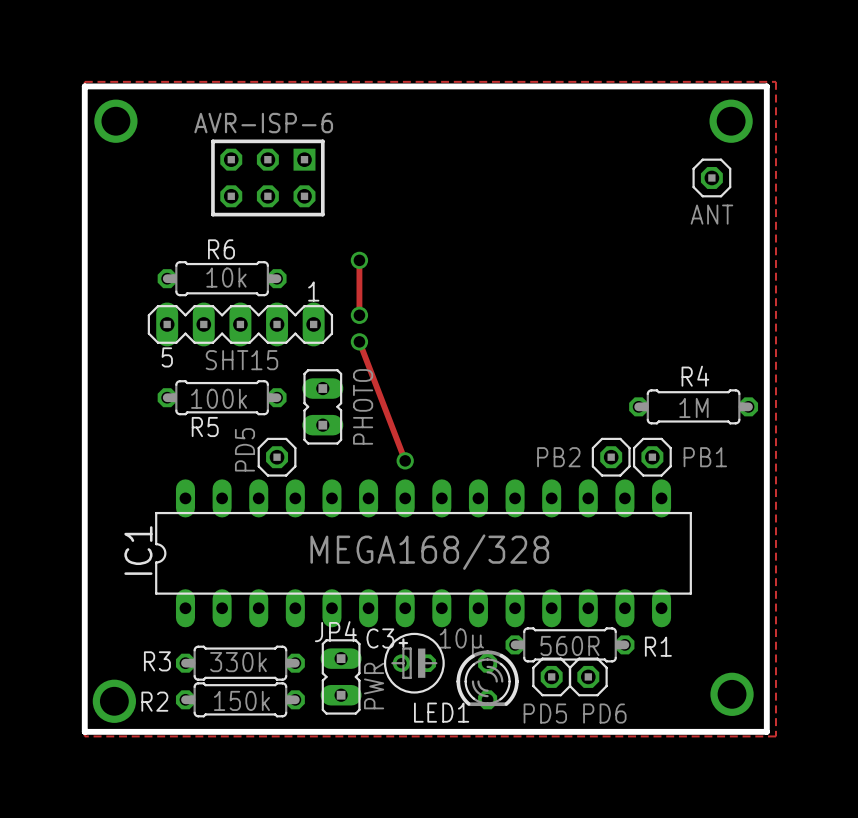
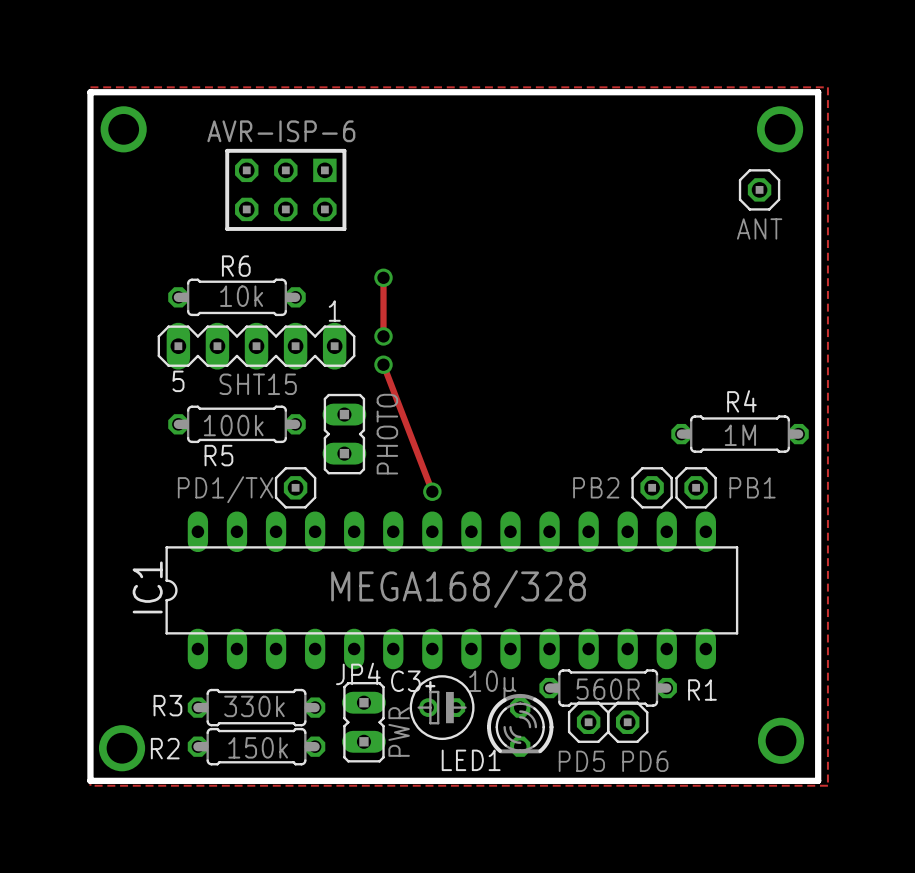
part value: PD5 (244, 449) -> PD1/TX (225, 489)

